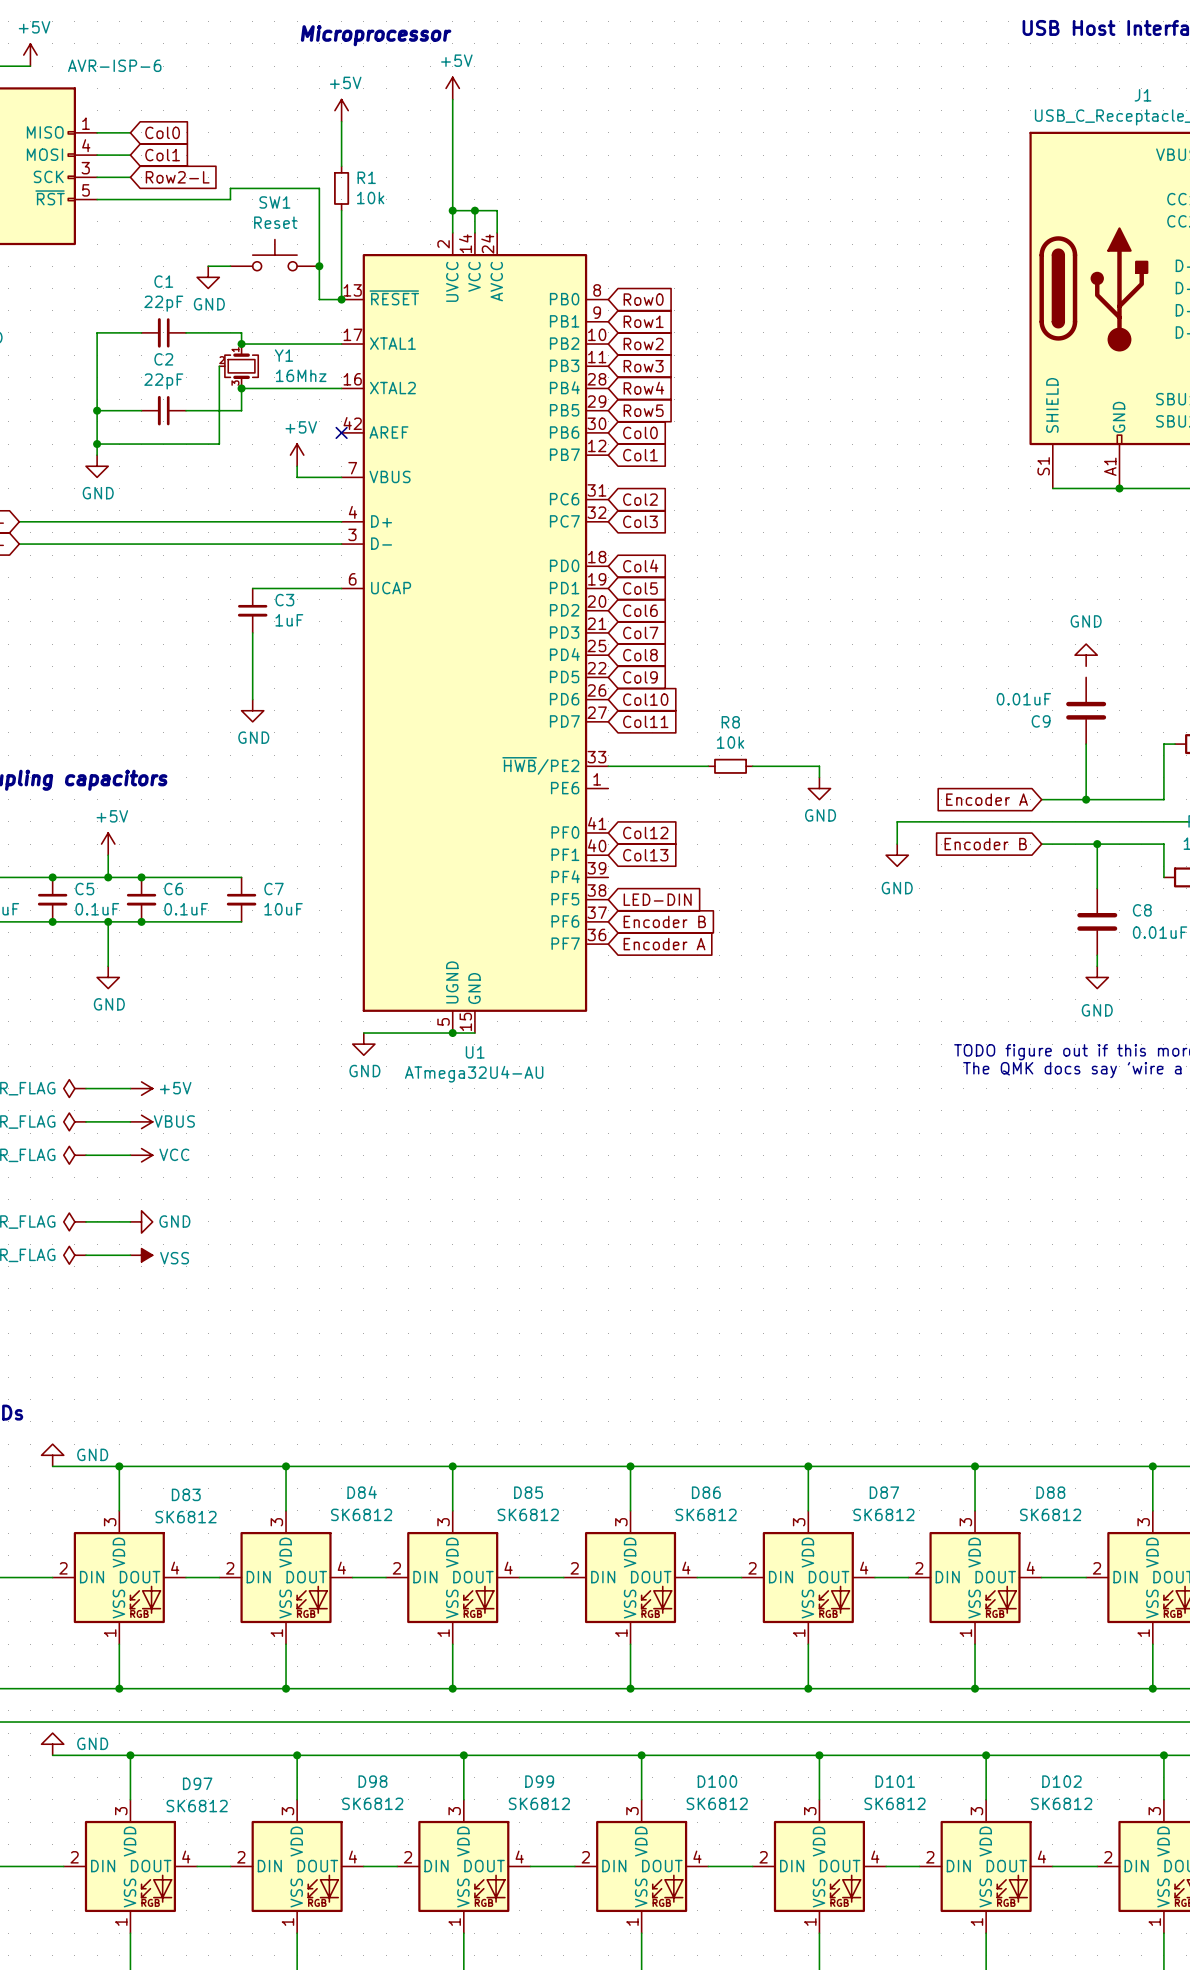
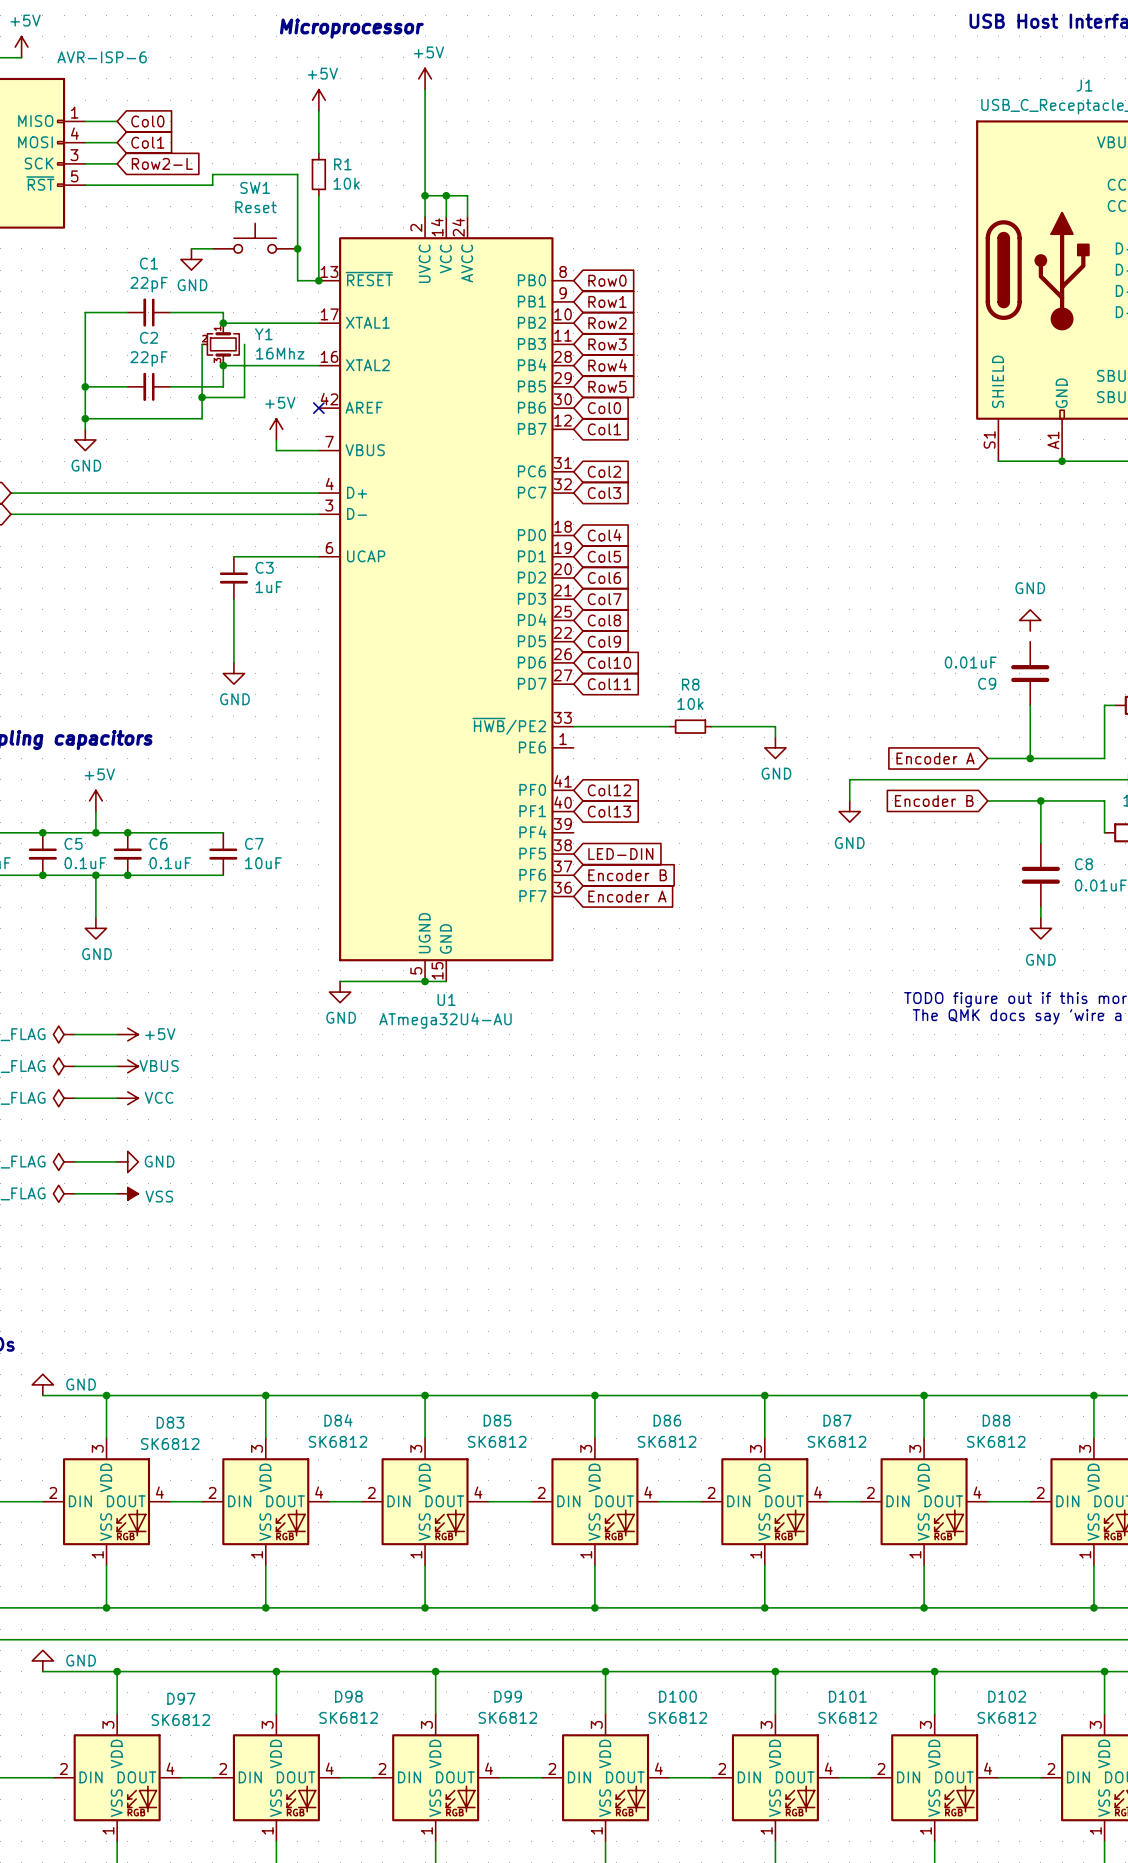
wire: none -> (244, 344) (244, 397) (202, 397)
junction: none -> (202, 397)

